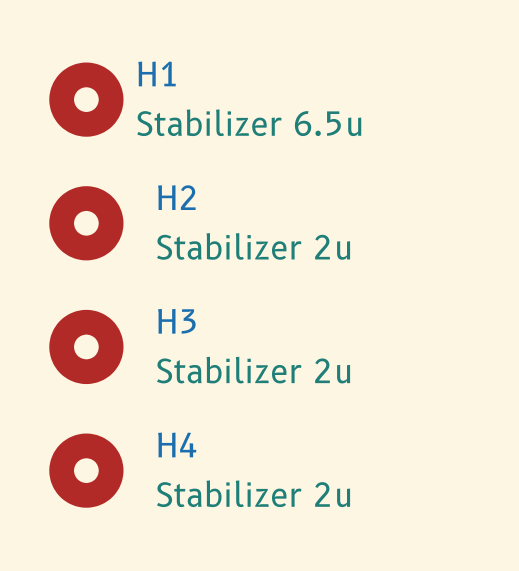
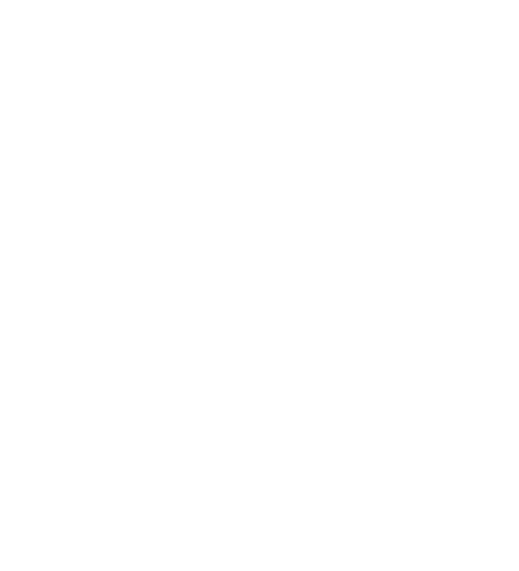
H1: Stabilizer 6.5u (86, 99) -> none
H2: Stabilizer 2u (86, 223) -> none
H3: Stabilizer 2u (86, 346) -> none
H4: Stabilizer 2u (86, 470) -> none

